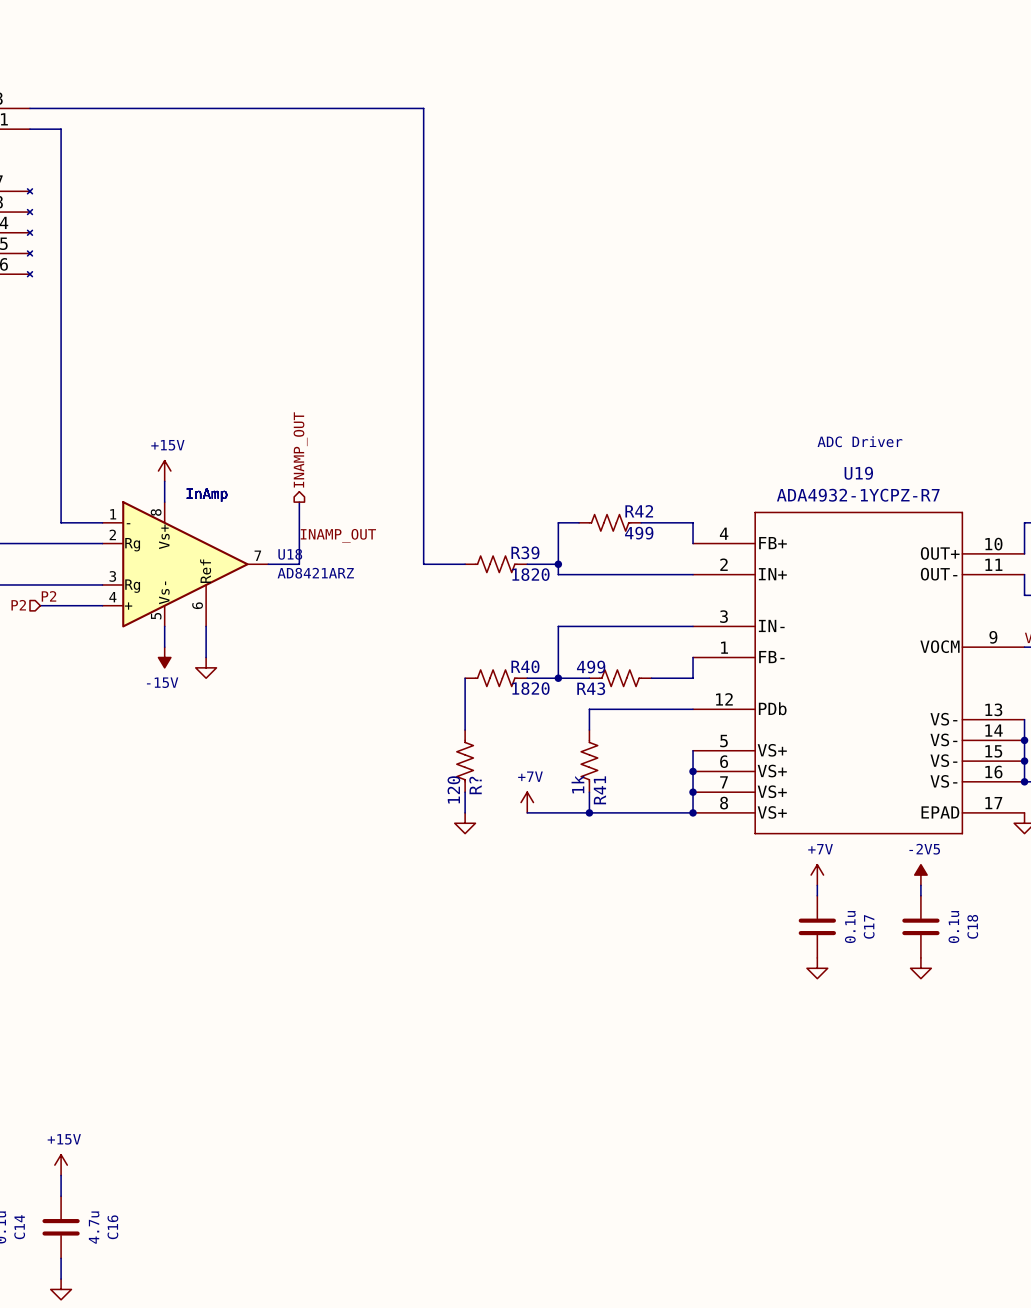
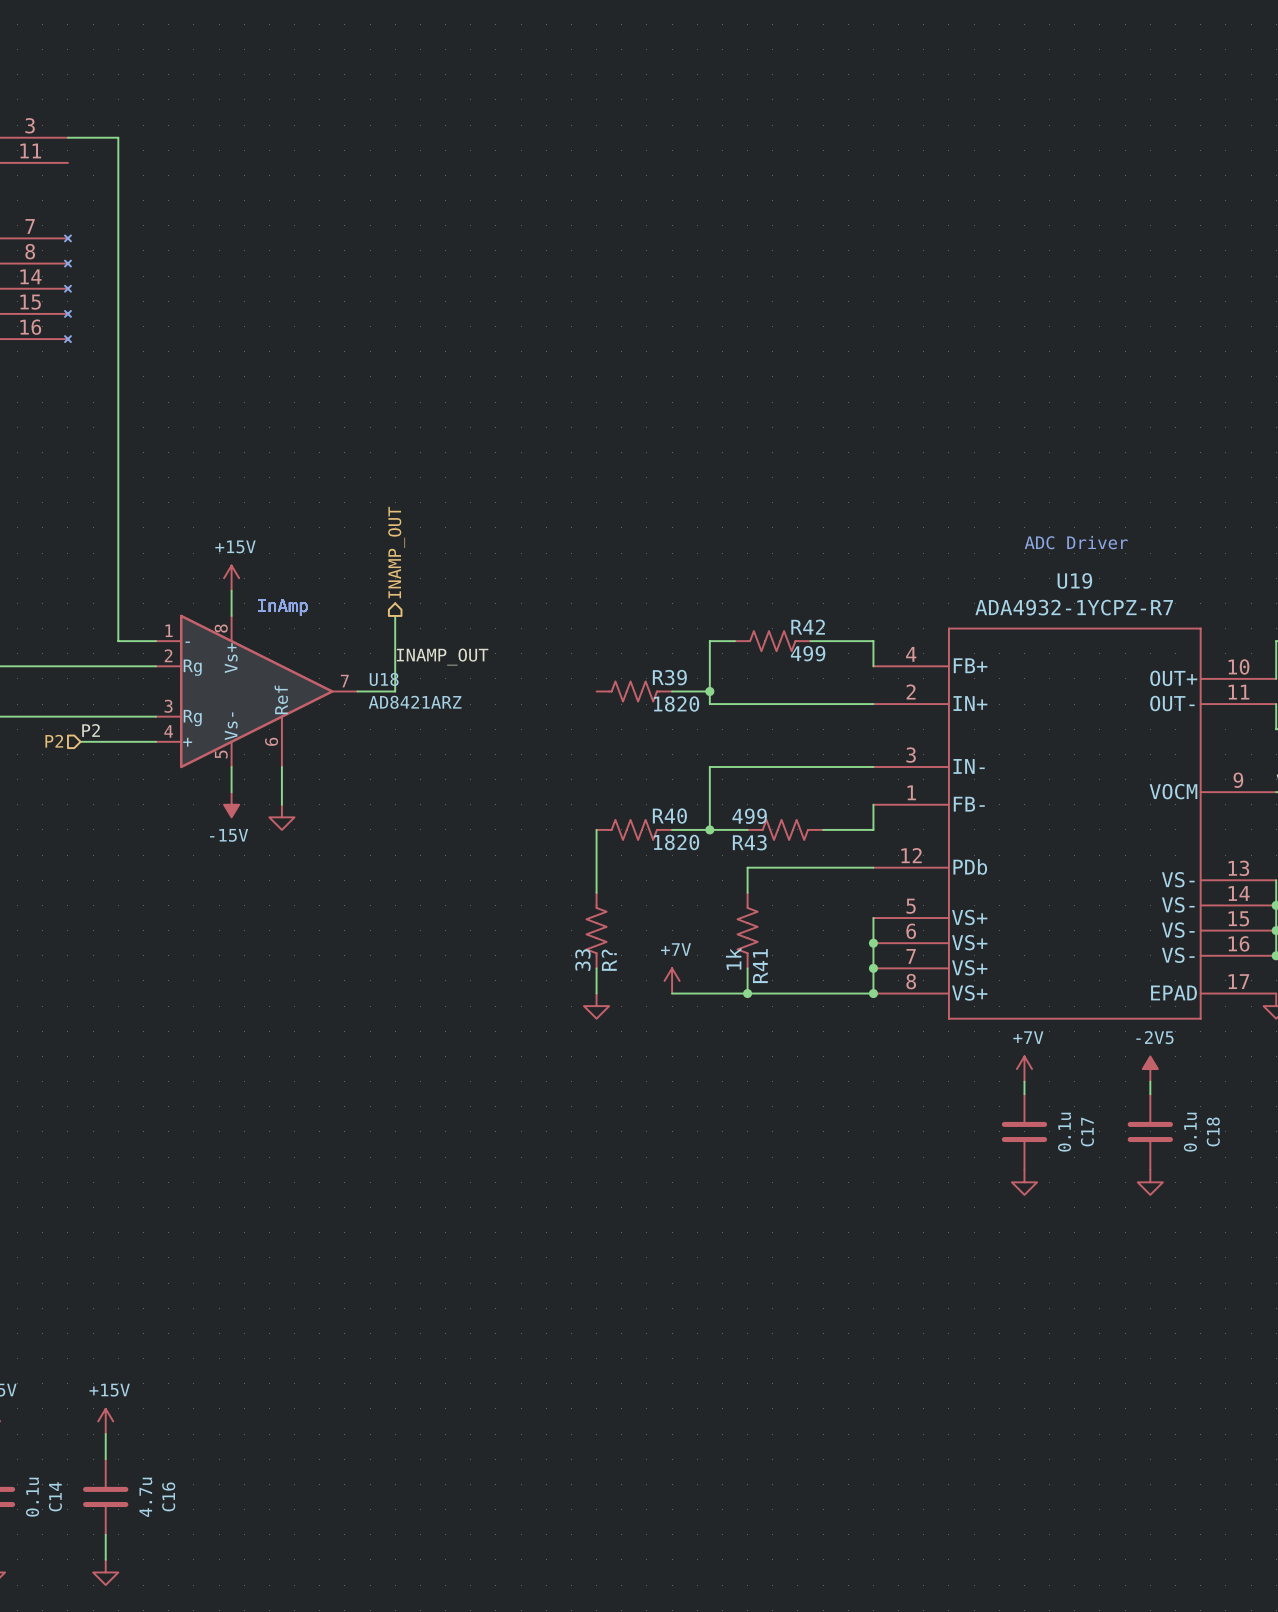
wire: (71, 108) (423, 108) (423, 564) (465, 564) -> none
wire: (29, 129) (61, 129) (61, 522) (71, 522) -> (118, 137) (118, 641)
R? value: 120 (453, 789) -> 33 (582, 960)

